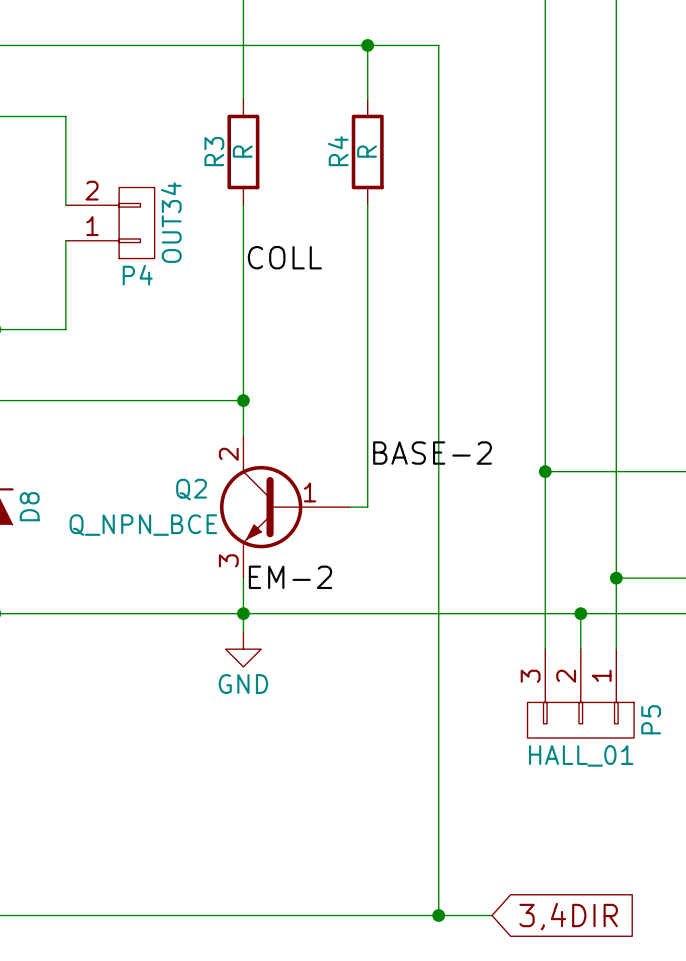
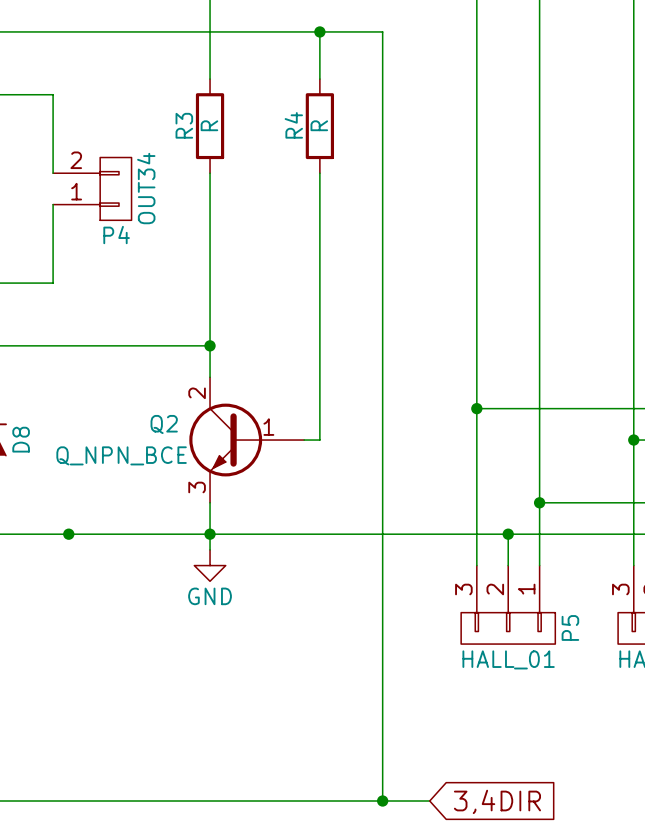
label: COLL (284, 257) -> none
label: BASE-2 (432, 453) -> none
label: EM-2 (290, 577) -> none
junction: none -> (68, 534)

